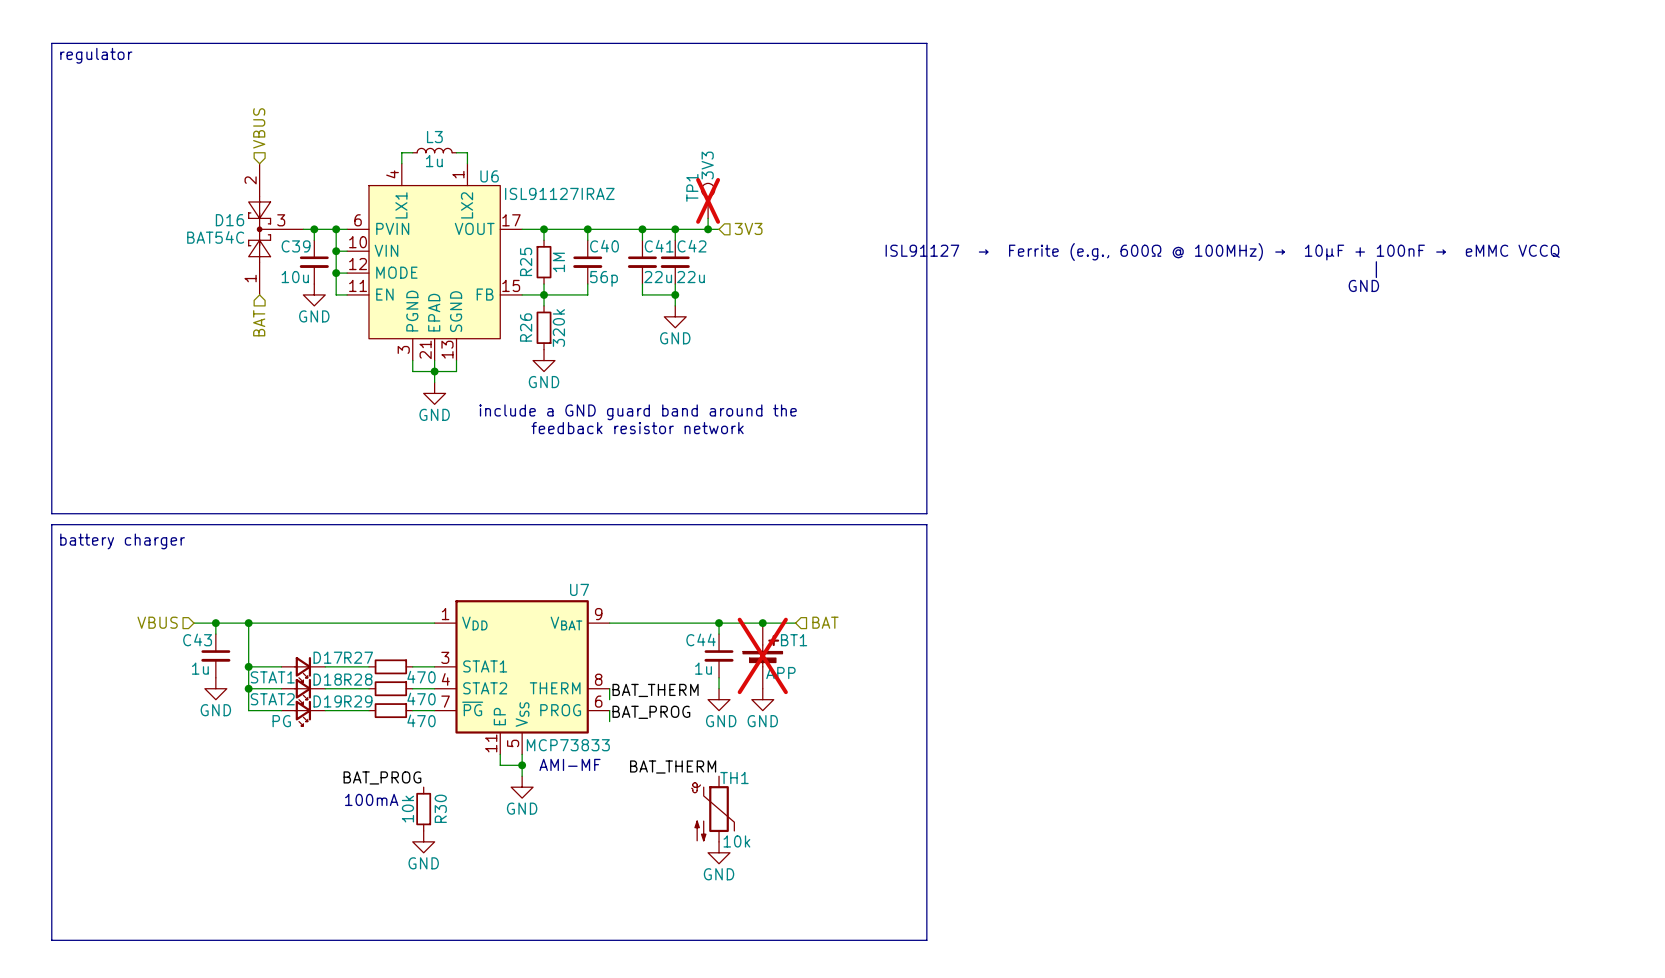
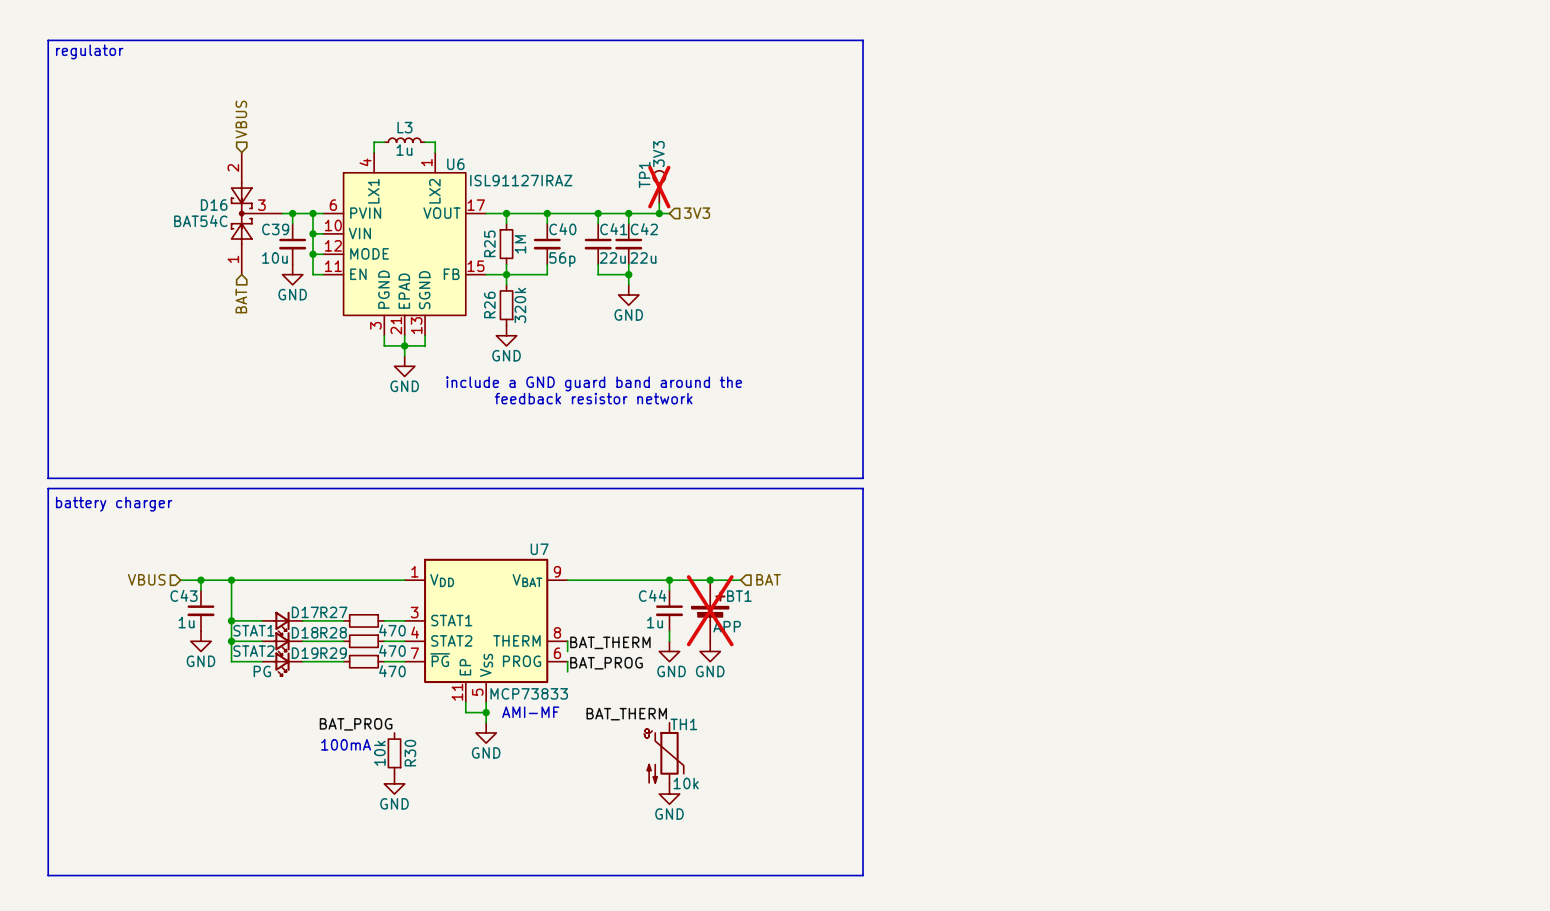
text: ISL91127 → Ferrite (e.g., 600Ω @ 100MHz) → 10µF + 100nF → eMMC VCCQ (1222, 252) -> none
text: | (1376, 269) -> none
text: GND (1363, 285) -> none

